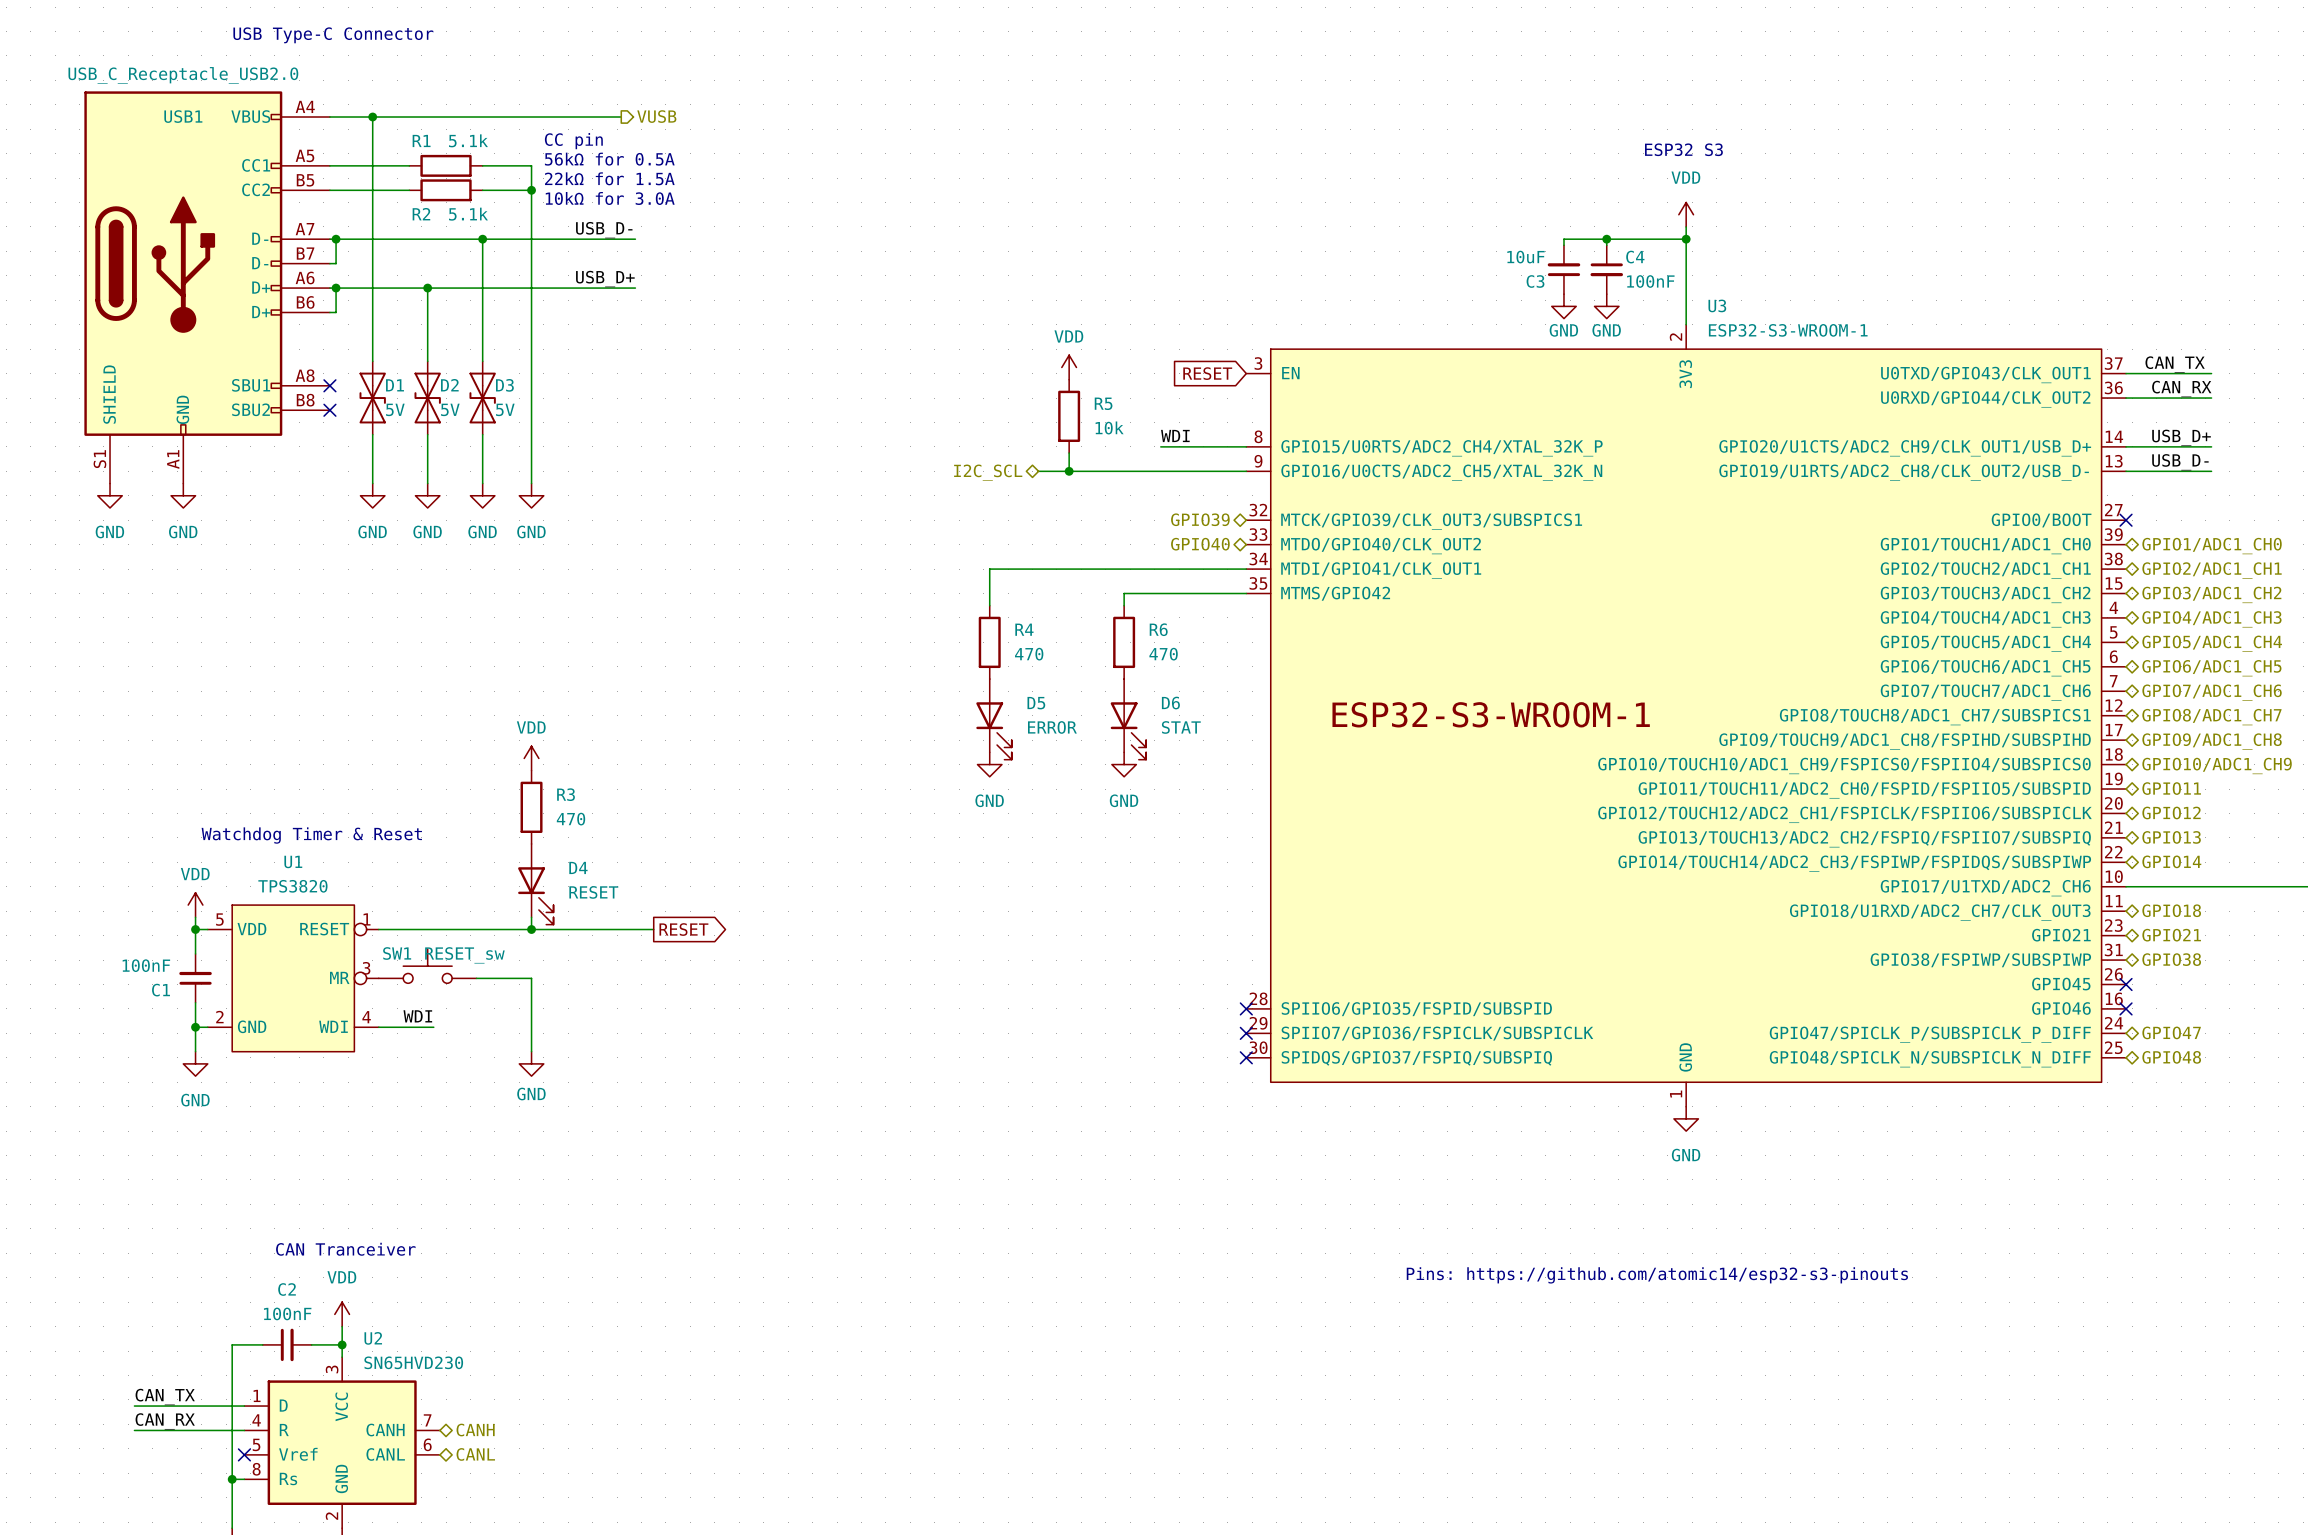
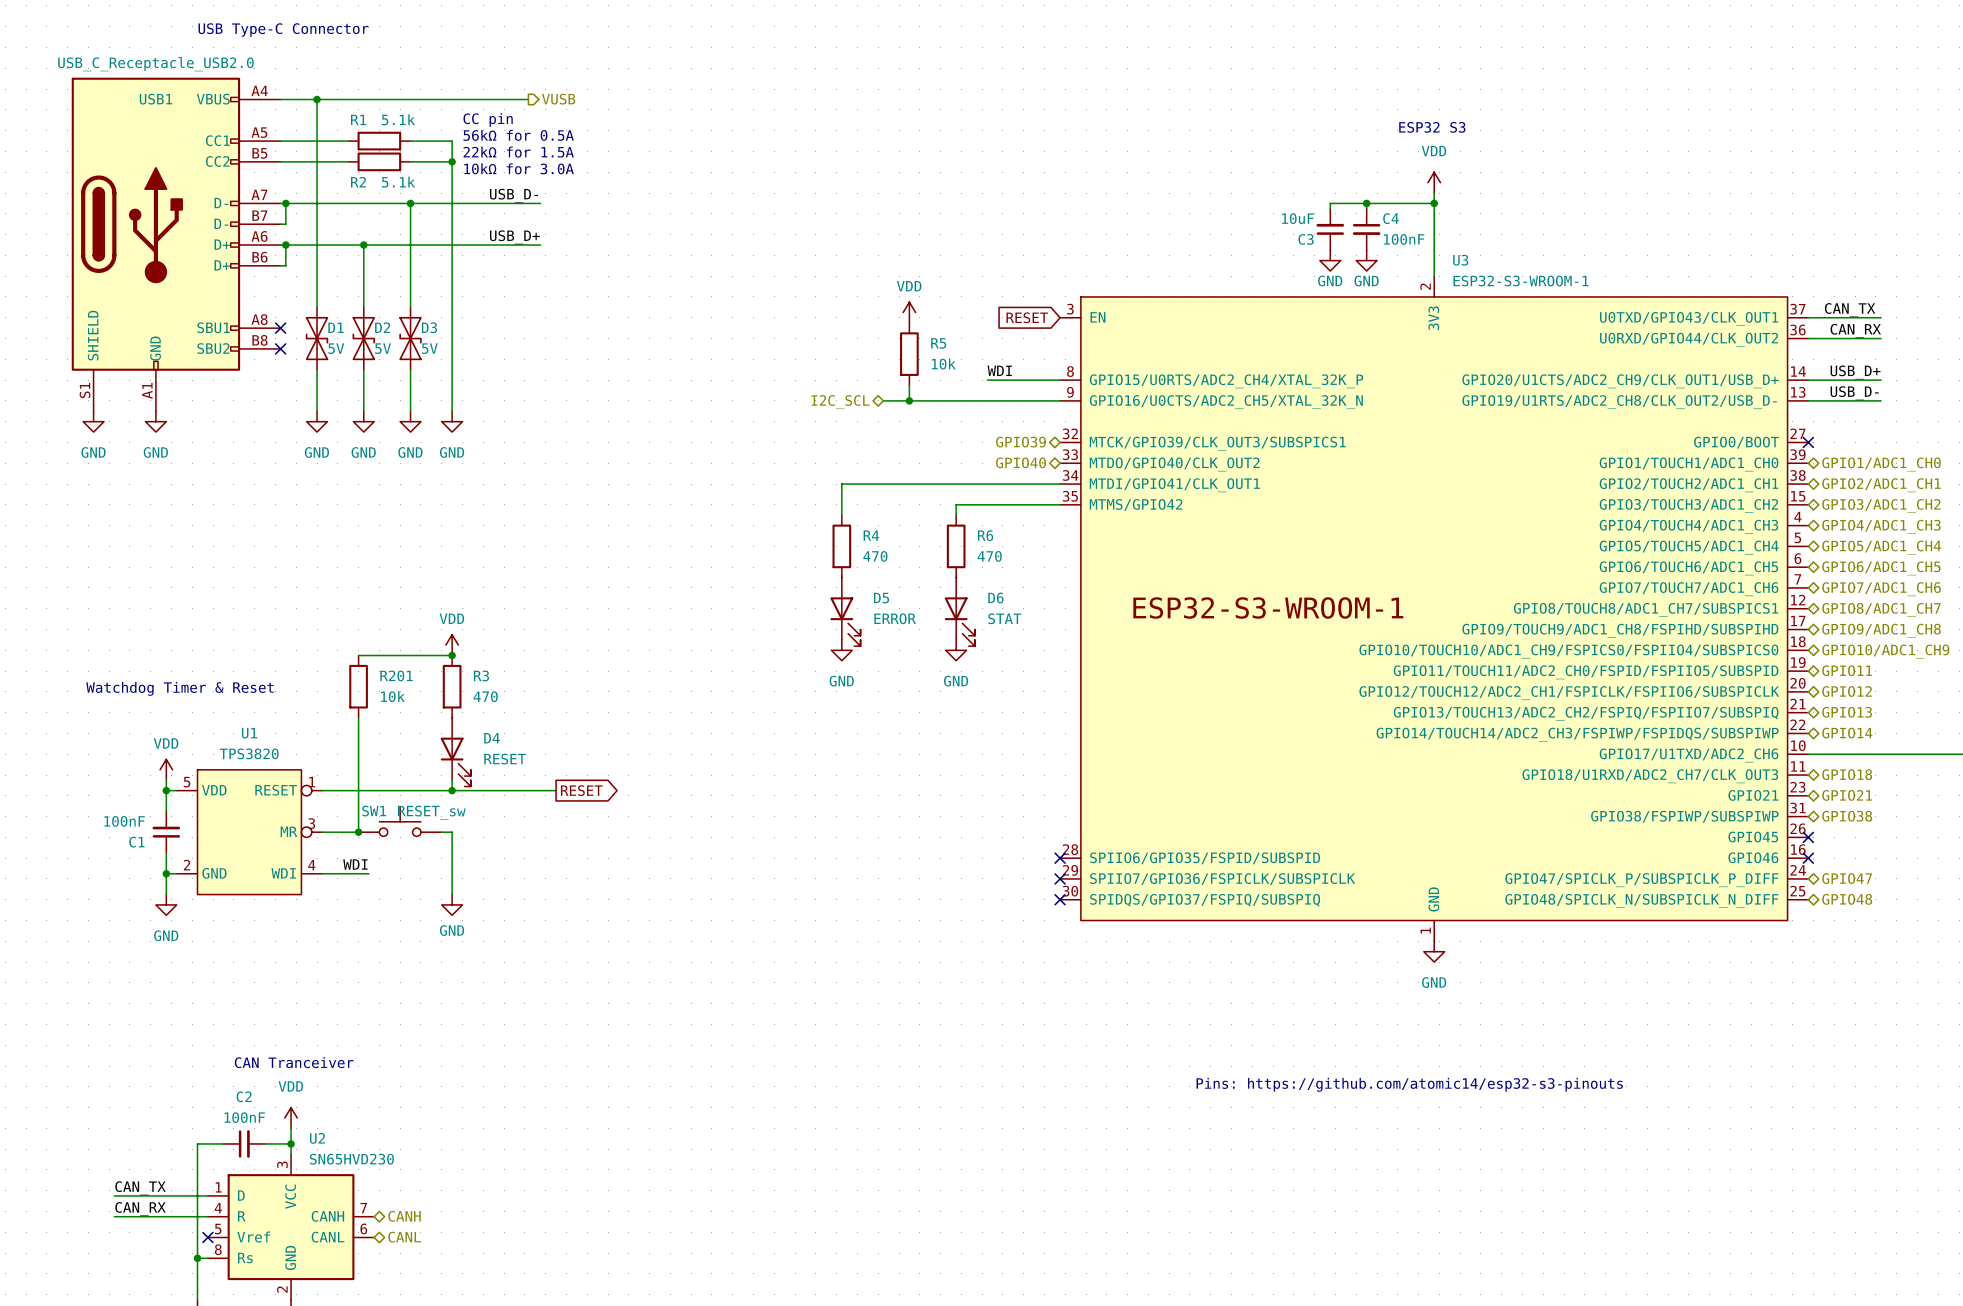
wire: none -> (358, 655) (452, 655)
junction: none -> (452, 655)
R201: none -> 10k (358, 686)
text position: Watchdog Timer & Reset (311, 835) -> Watchdog Timer & Reset (180, 688)
wire: none -> (358, 717) (358, 832) (322, 832)
SW1 position: (427, 966) -> (400, 821)
junction: none -> (358, 832)

